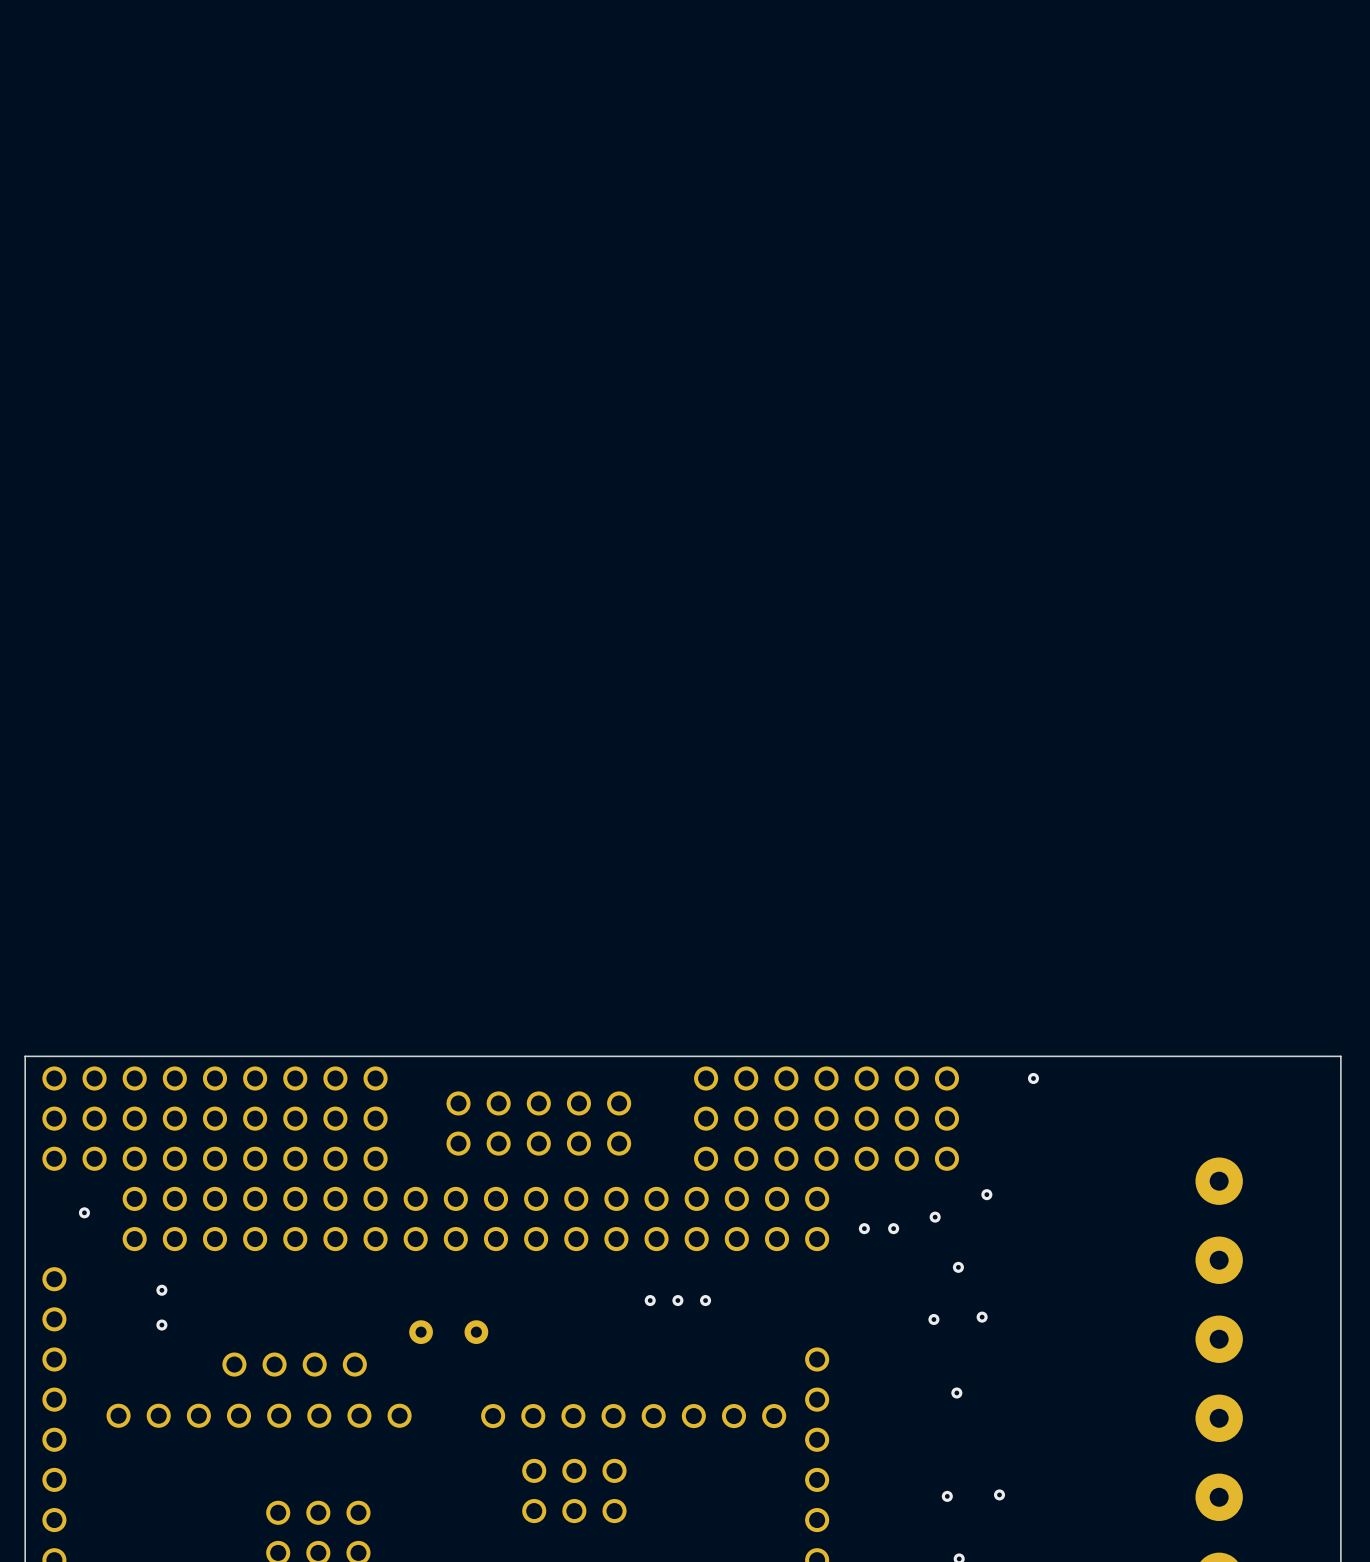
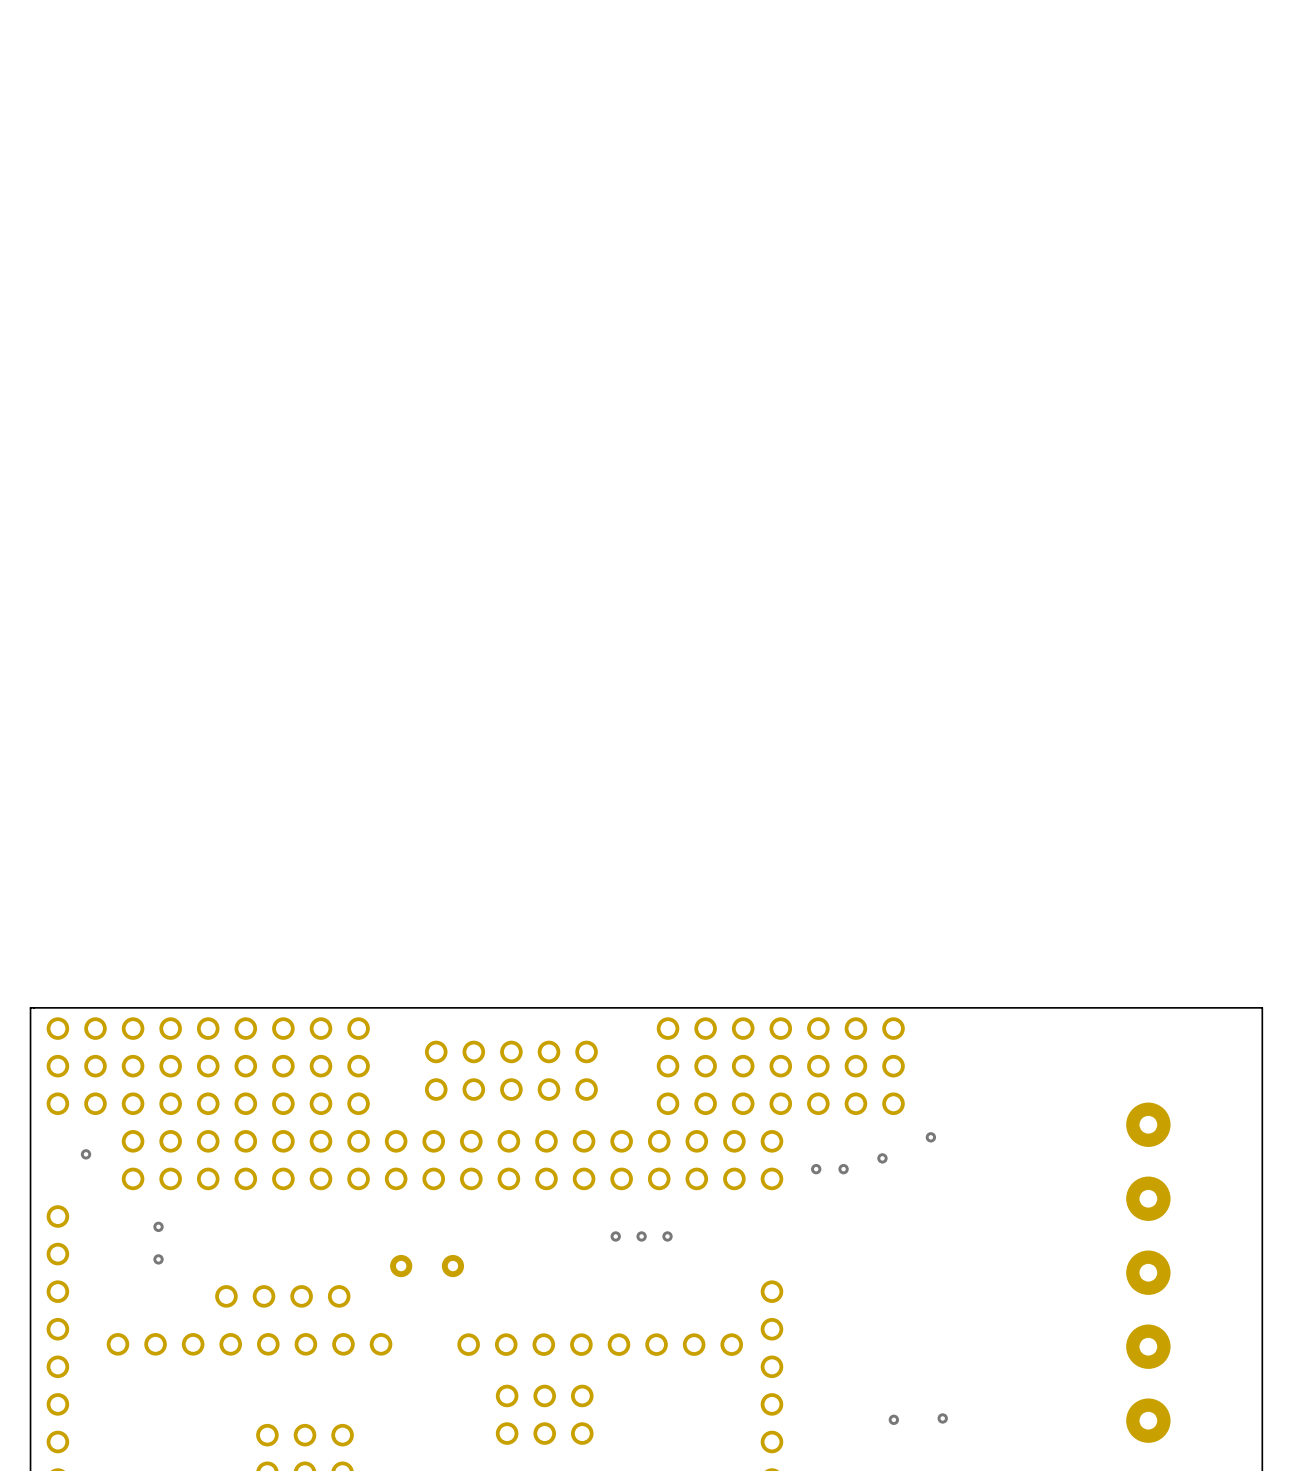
via: (1033, 1078) -> none
via: (958, 1267) -> none
via: (982, 1317) -> none
via: (933, 1319) -> none
via: (956, 1392) -> none

